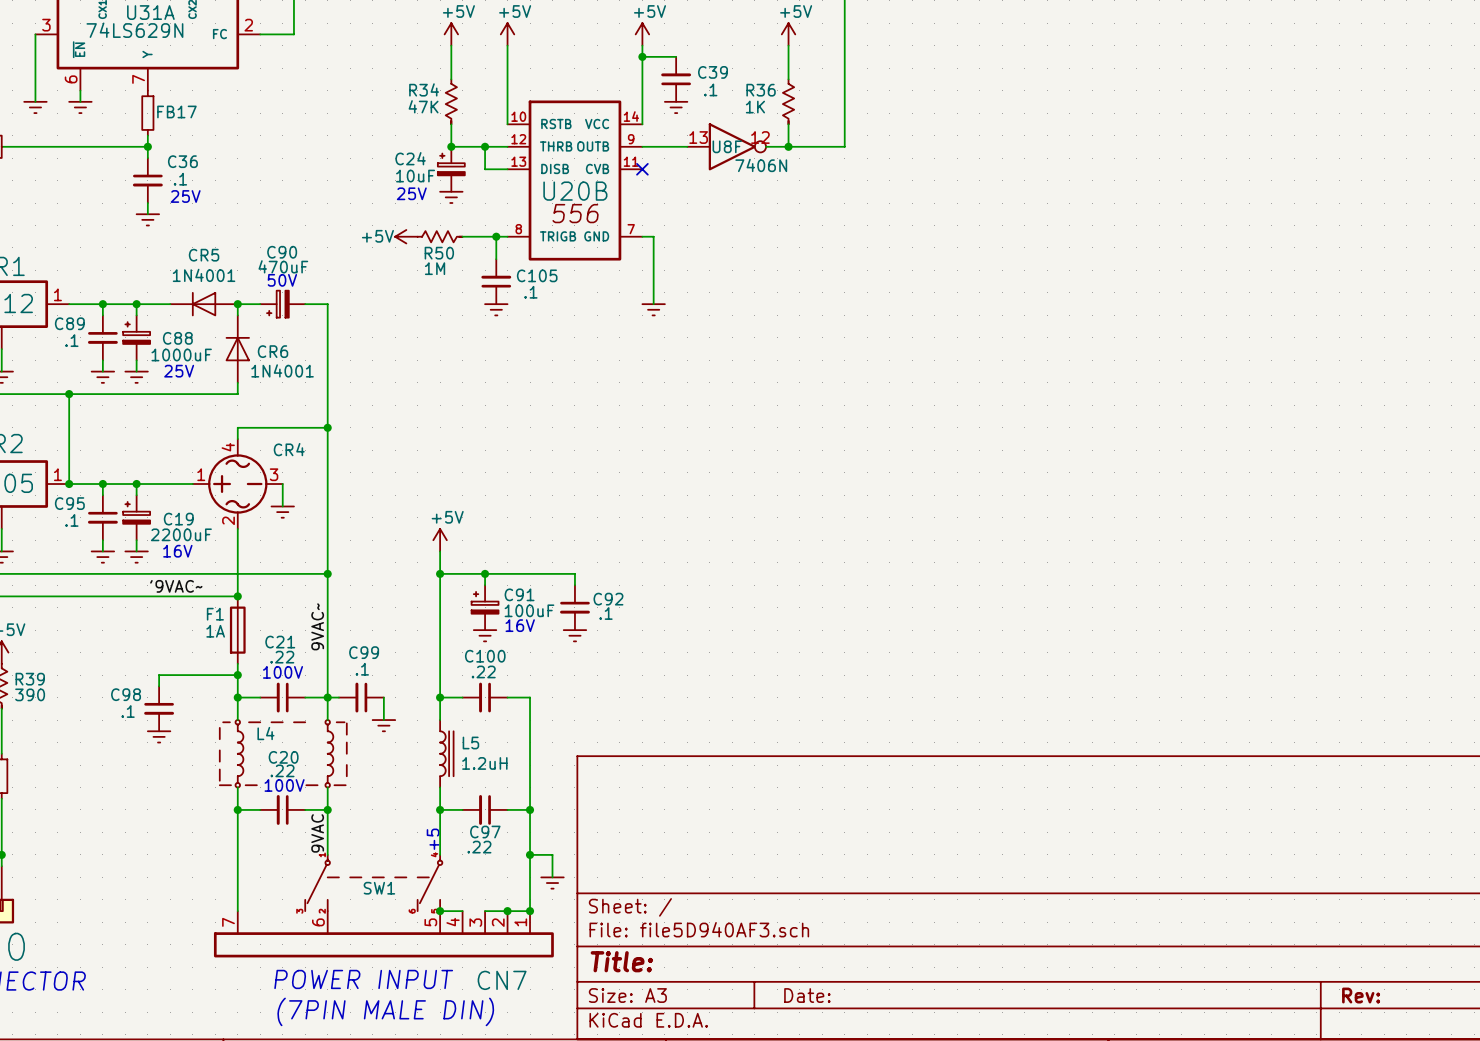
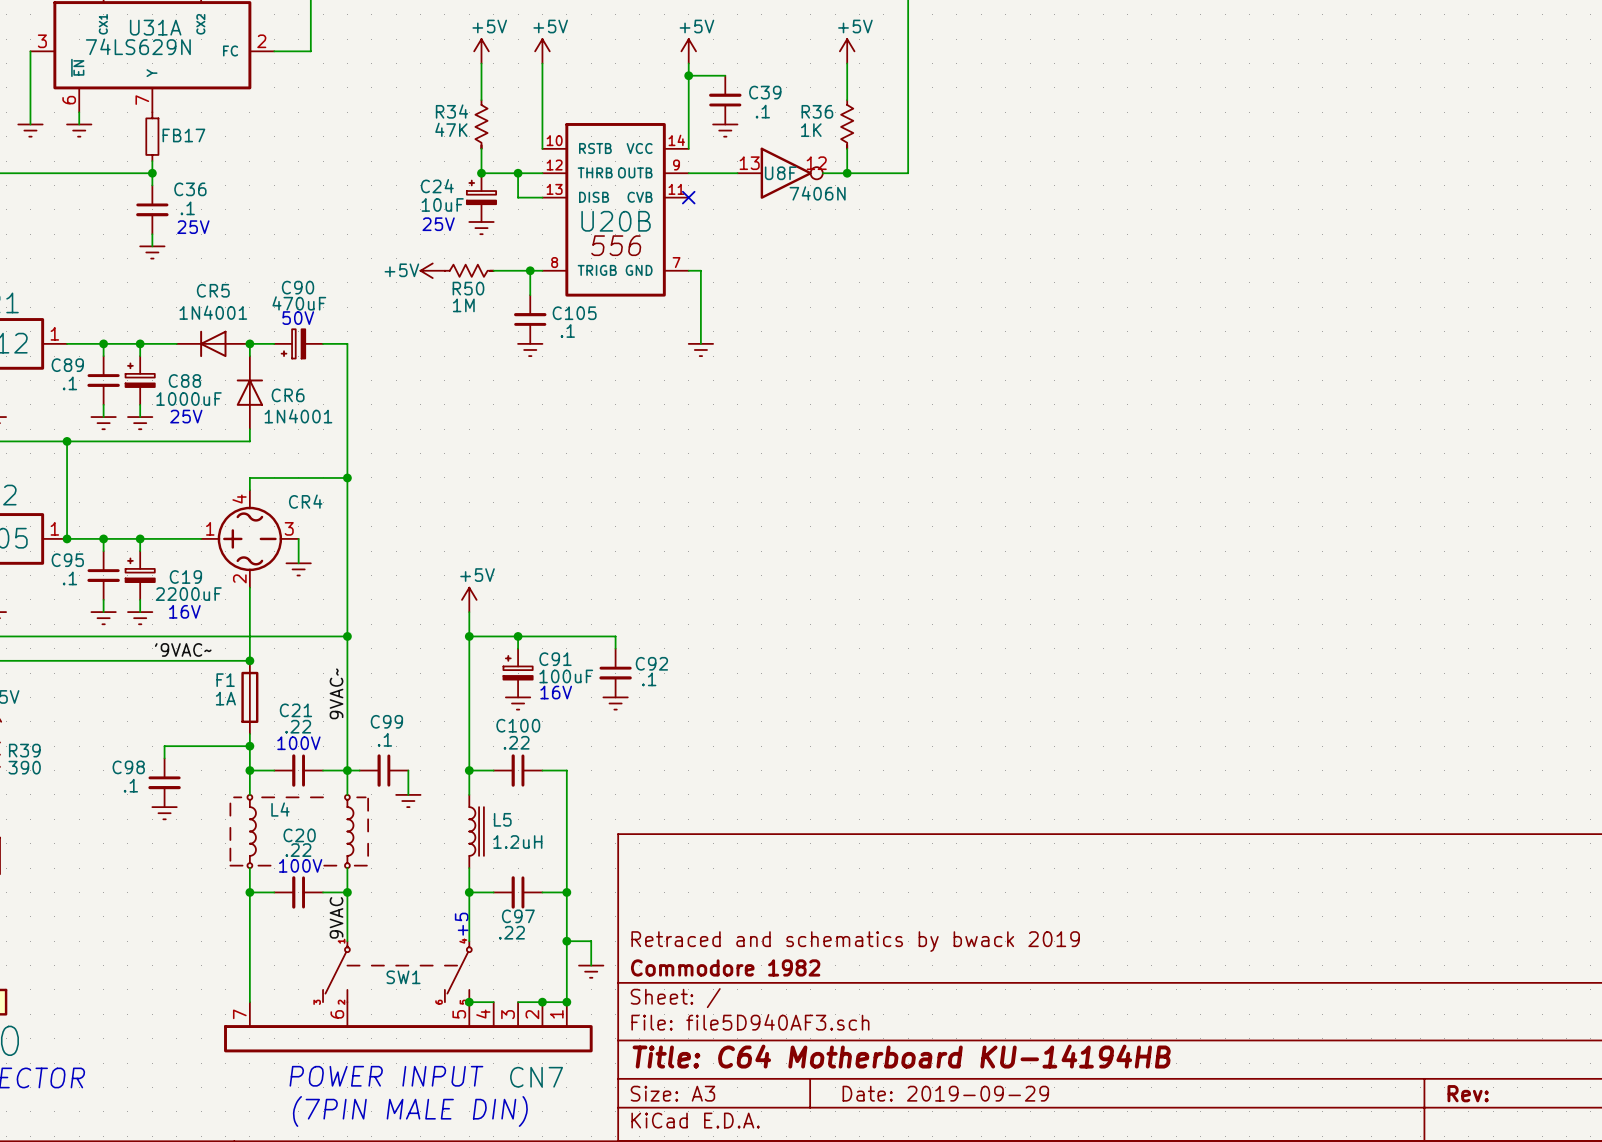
title block: none -> Retraced and schematics by bwack 2019 (855, 941)
title block: none -> Commodore 1982 (725, 967)
title block: Title: (621, 961) -> Title: C64 Motherboard KU-14194HB (901, 1056)
title block: Date: (807, 995) -> Date: 2019-09-29 (945, 1093)

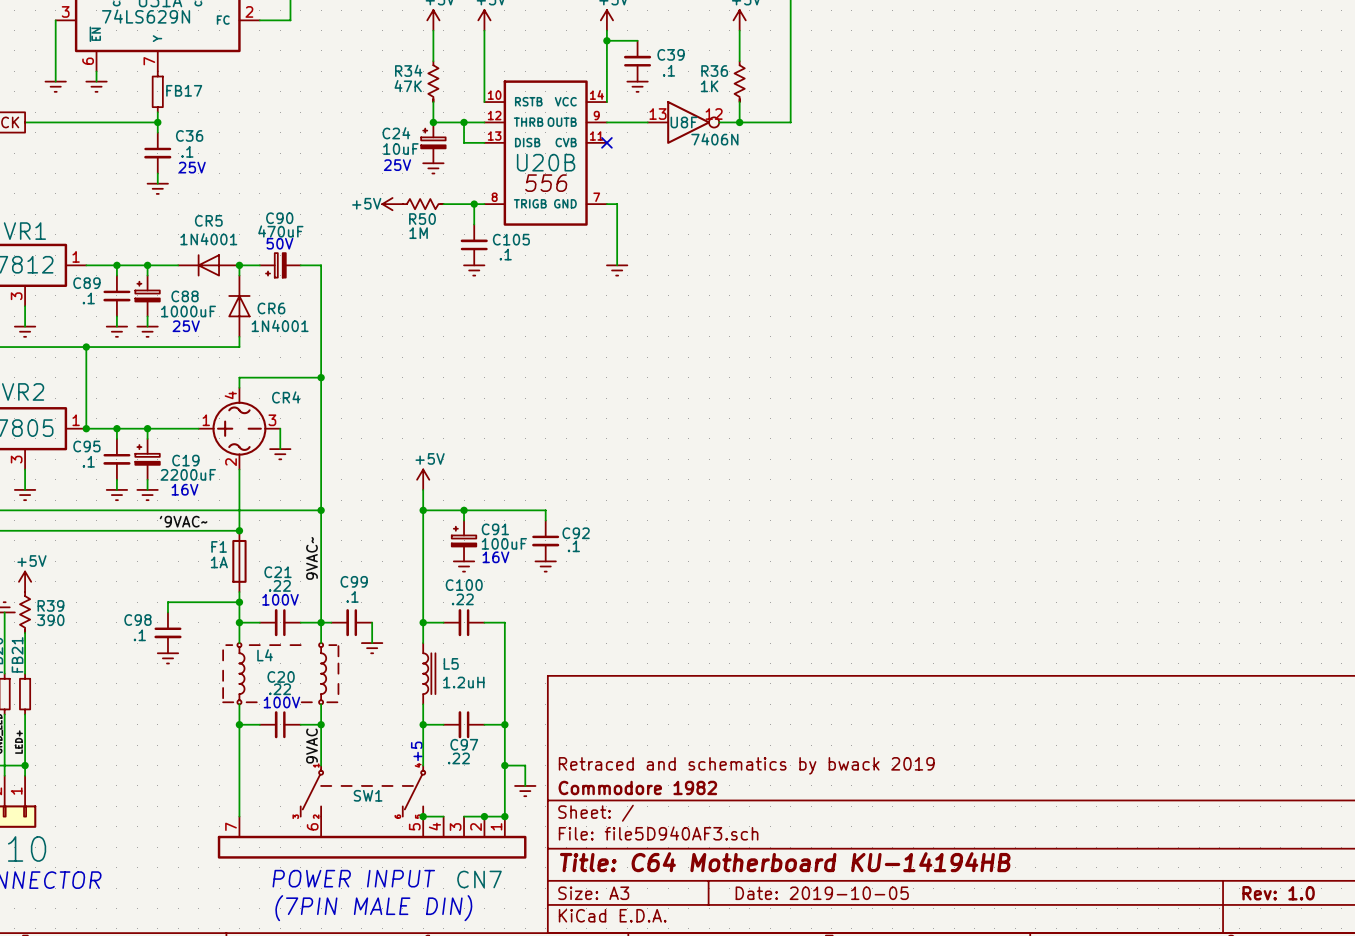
title block: Date: 2019-09-29 (945, 1093) -> Date: 2019-10-05 (822, 893)
title block: Rev: (1468, 1093) -> Rev: 1.0 (1278, 893)

